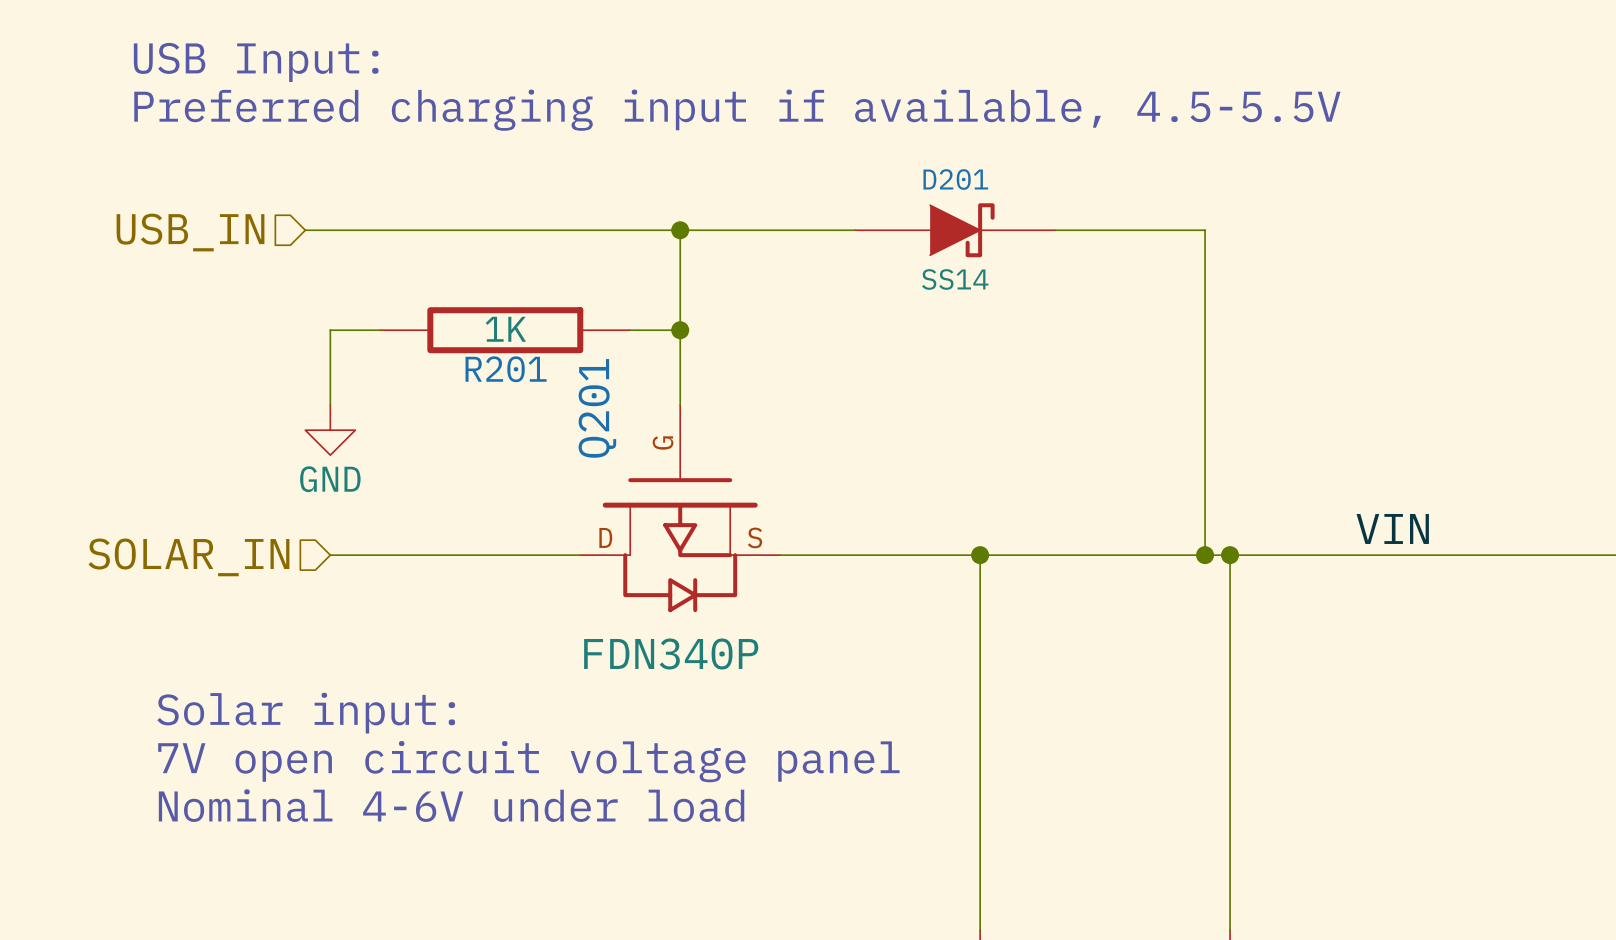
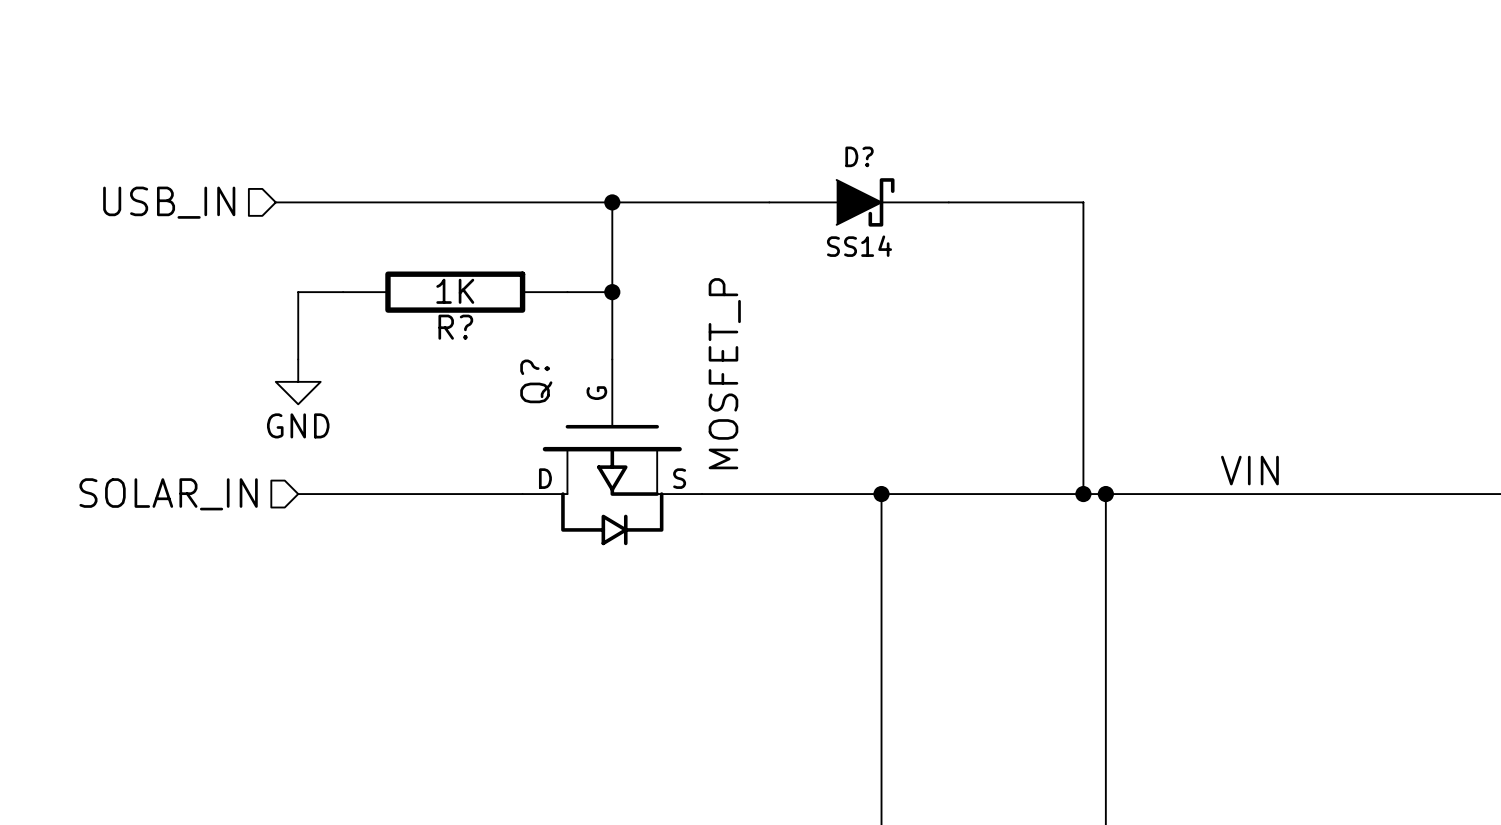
text: USB Input: (256, 62) -> none
text: Preferred charging input if available, 4.5-5.5V (737, 110) -> none
D201 name: D201 (955, 179) -> D? (859, 156)
R201 name: R201 (506, 369) -> R? (455, 327)
Q201 name: Q201 (597, 408) -> Q? (536, 381)
Q201 value: FDN340P (671, 653) -> MOSFET_P (724, 373)
text: Solar input: (306, 713) -> none
text: 7V open circuit voltage panel (528, 761) -> none
text: Nominal 4-6V under load (451, 805) -> none

